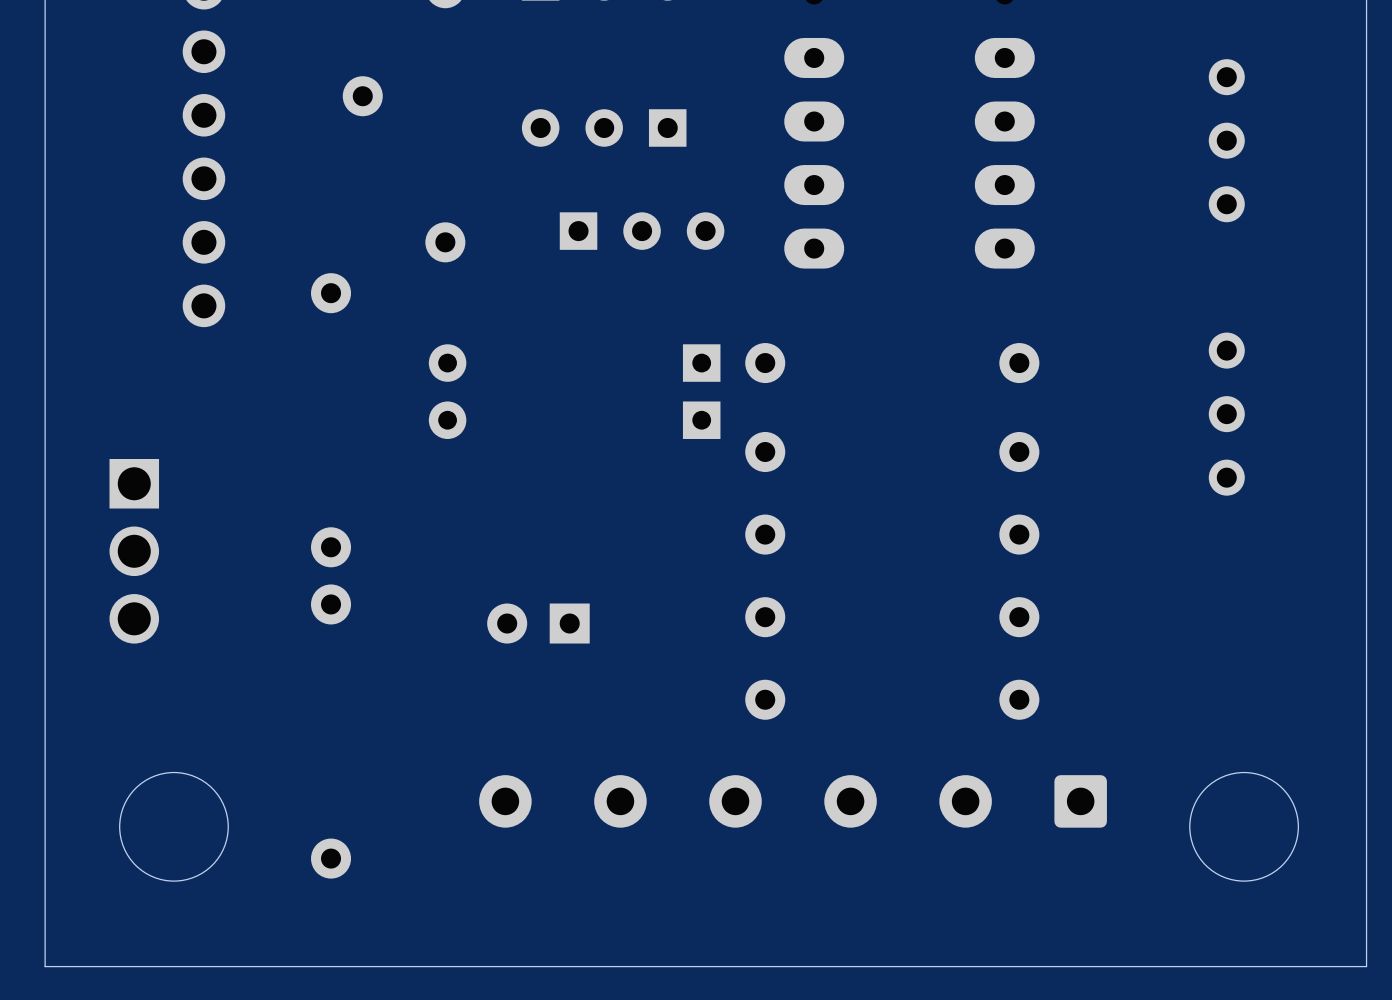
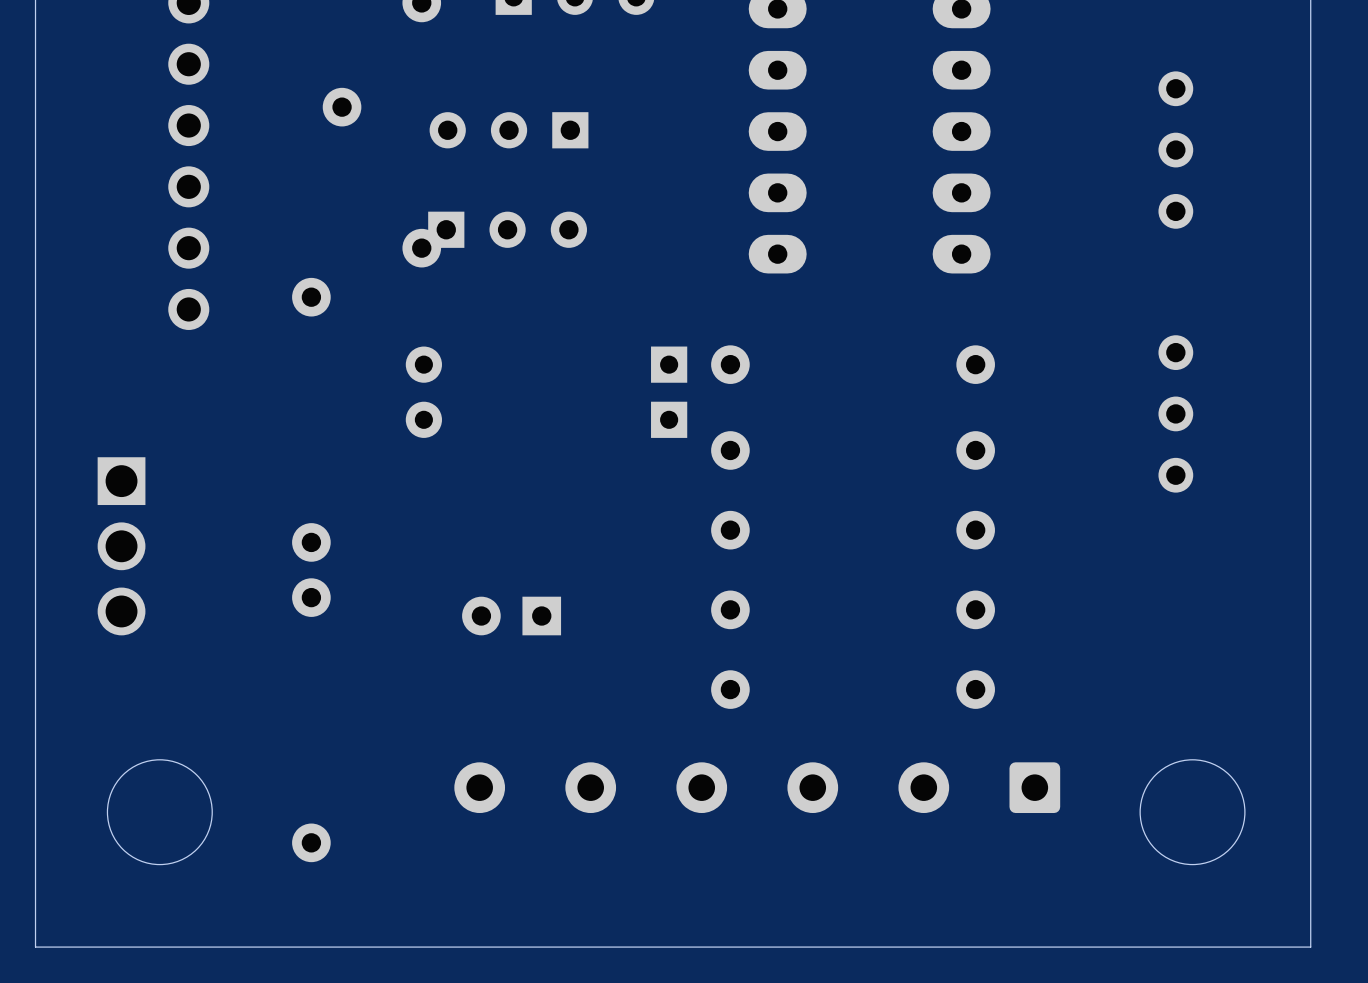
part: none -> (509, 130)
part: (604, 127) -> none
part: none -> (507, 229)
part: (642, 231) -> none

